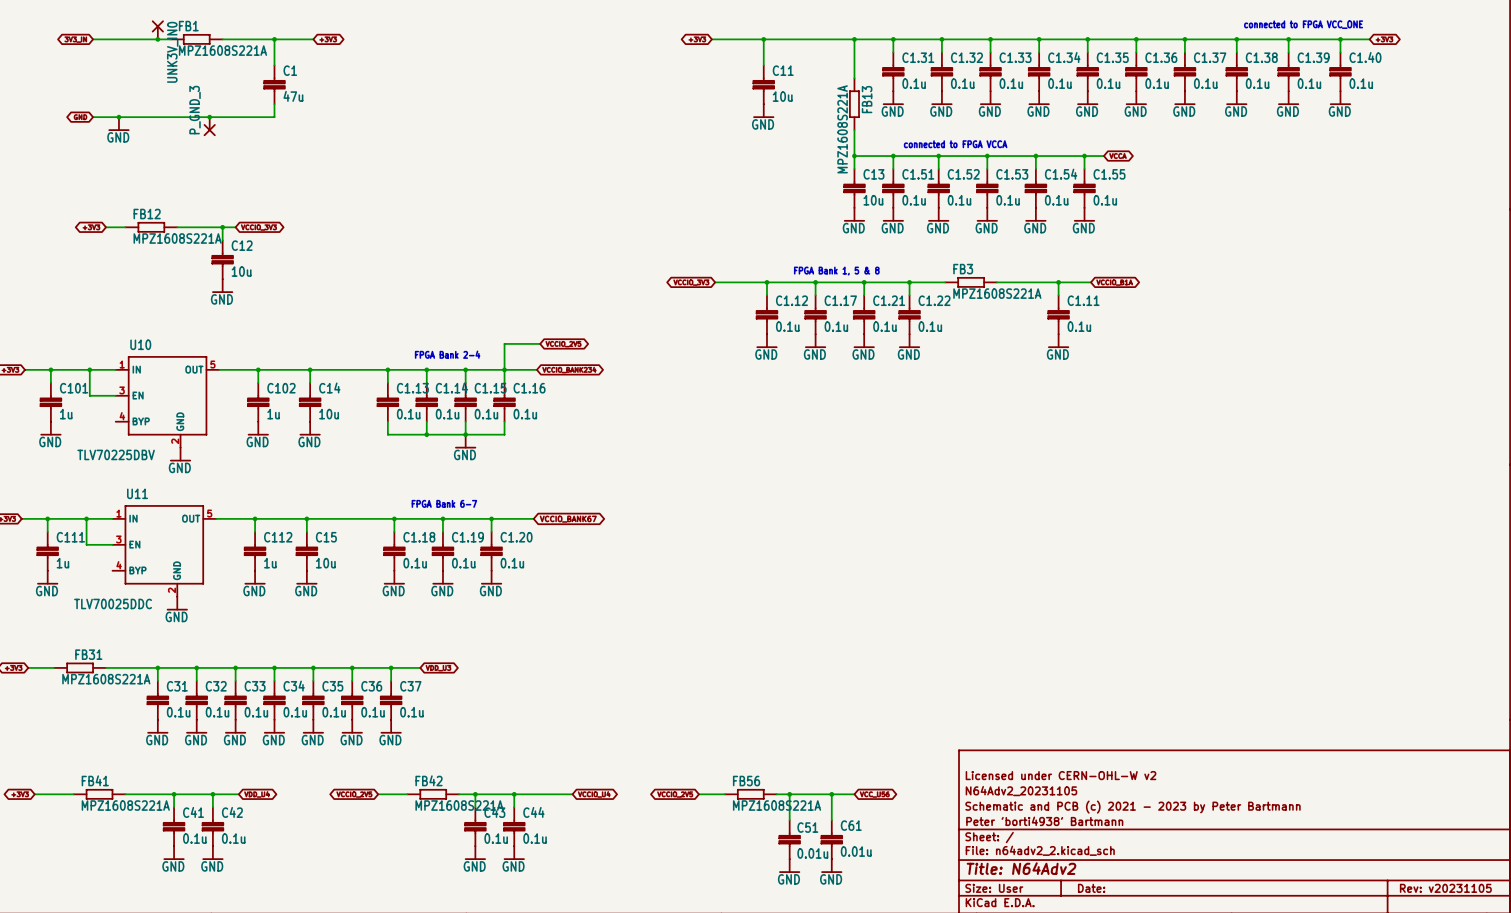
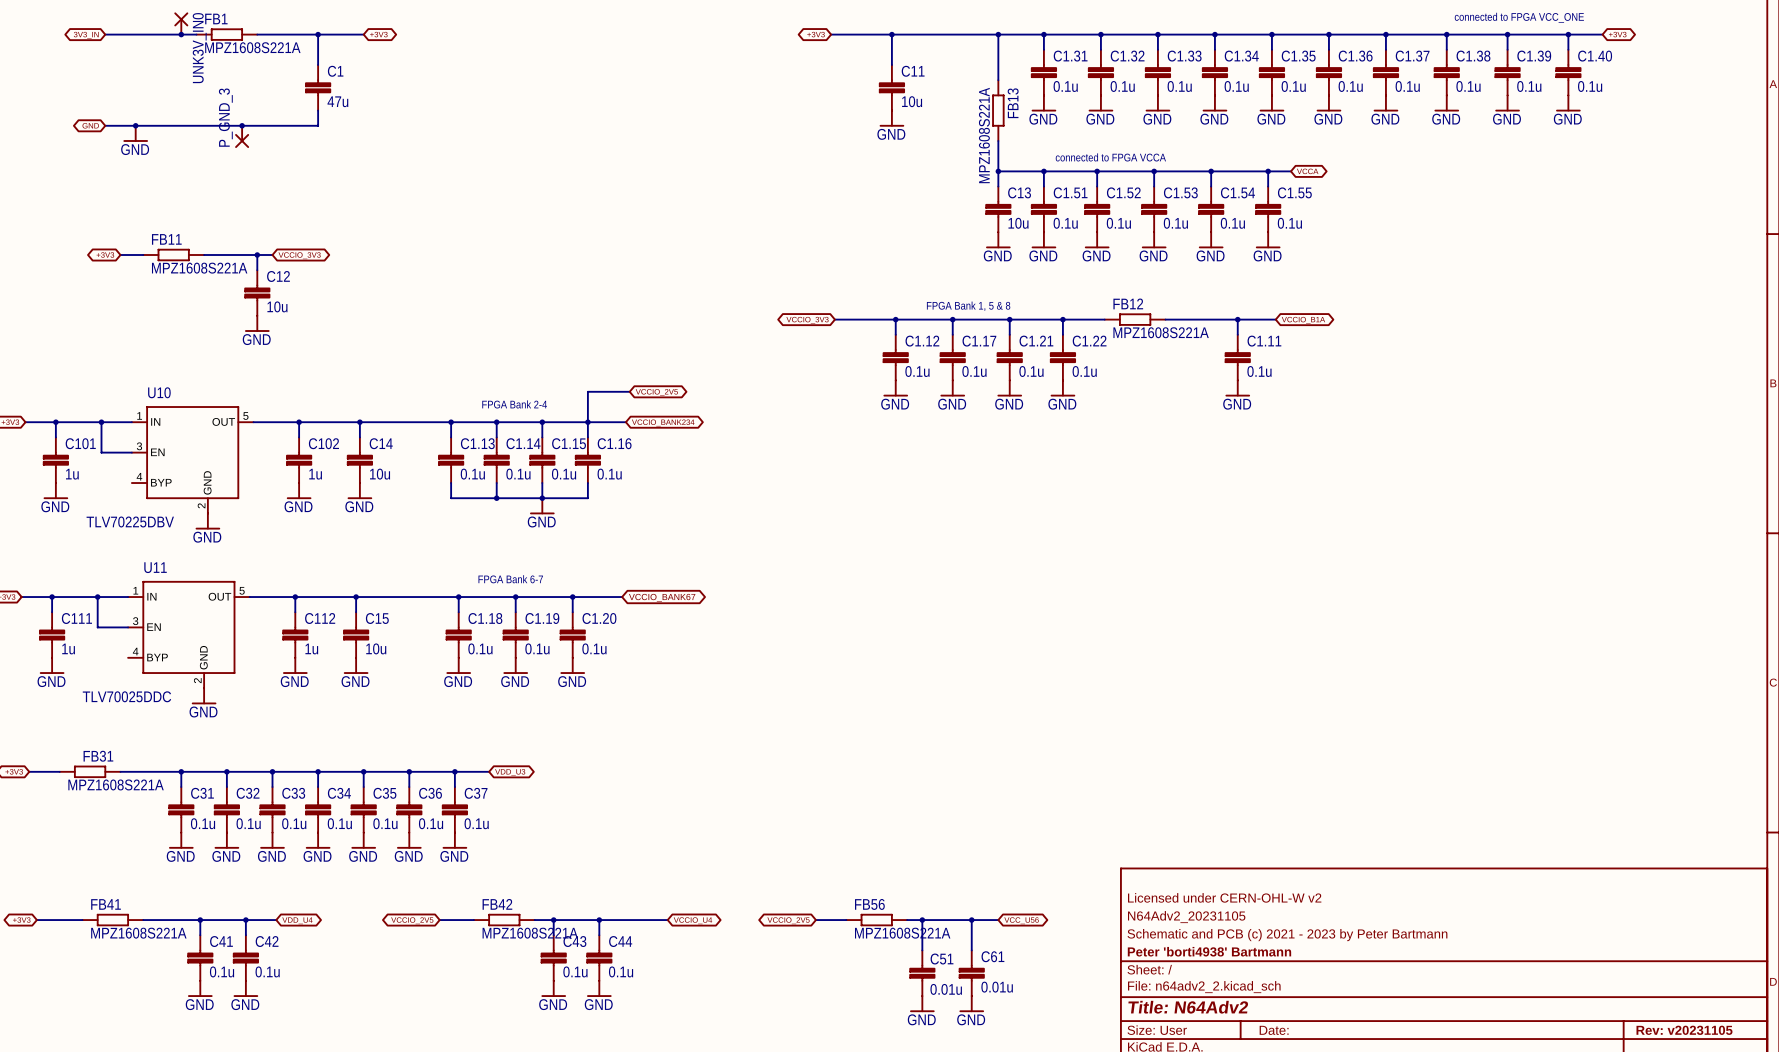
FB12 name: FB12 (147, 214) -> FB11 (166, 239)
FB3 name: FB3 (963, 269) -> FB12 (1128, 303)

